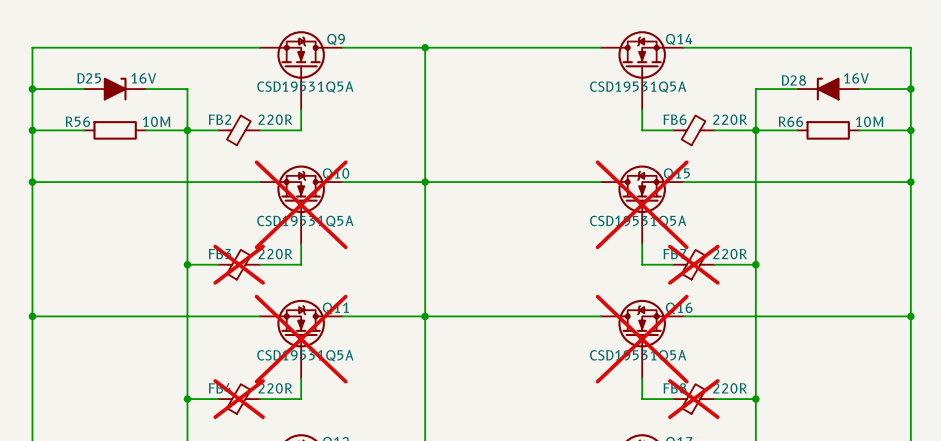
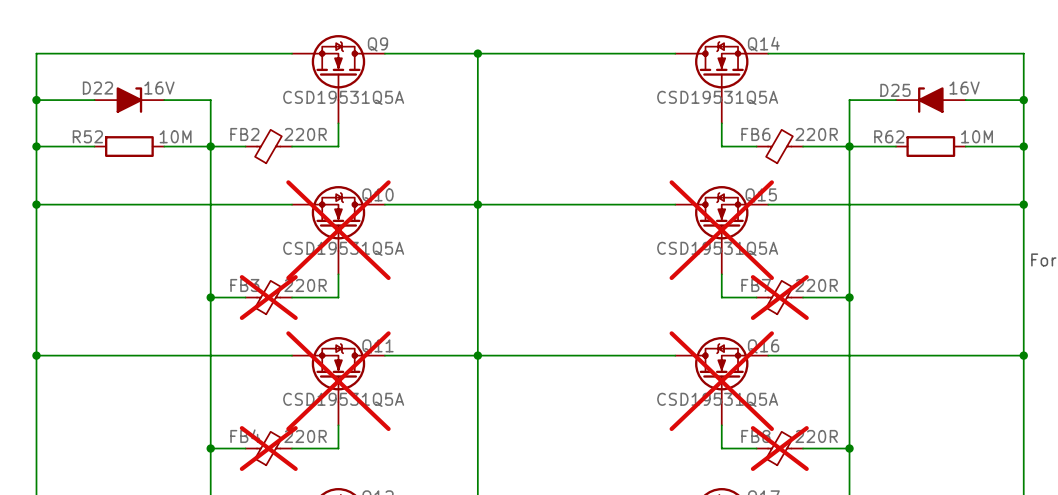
D25 name: D25 (89, 78) -> D22 (97, 88)
D28 name: D28 (793, 80) -> D25 (895, 90)
R56 name: R56 (77, 121) -> R52 (87, 136)
R66 name: R66 (790, 121) -> R62 (889, 136)

